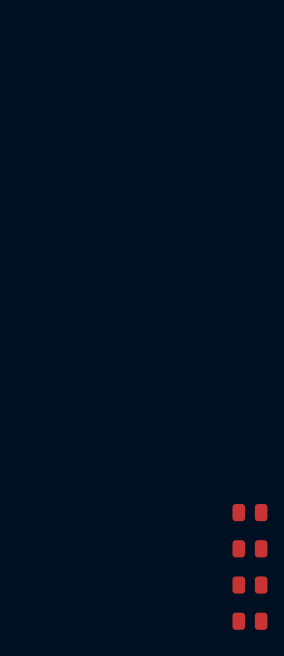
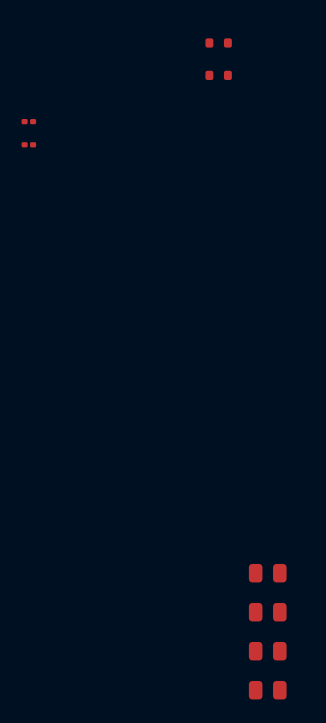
part: none -> (218, 42)
part: none -> (218, 75)
part: none -> (28, 121)
part: none -> (28, 144)

